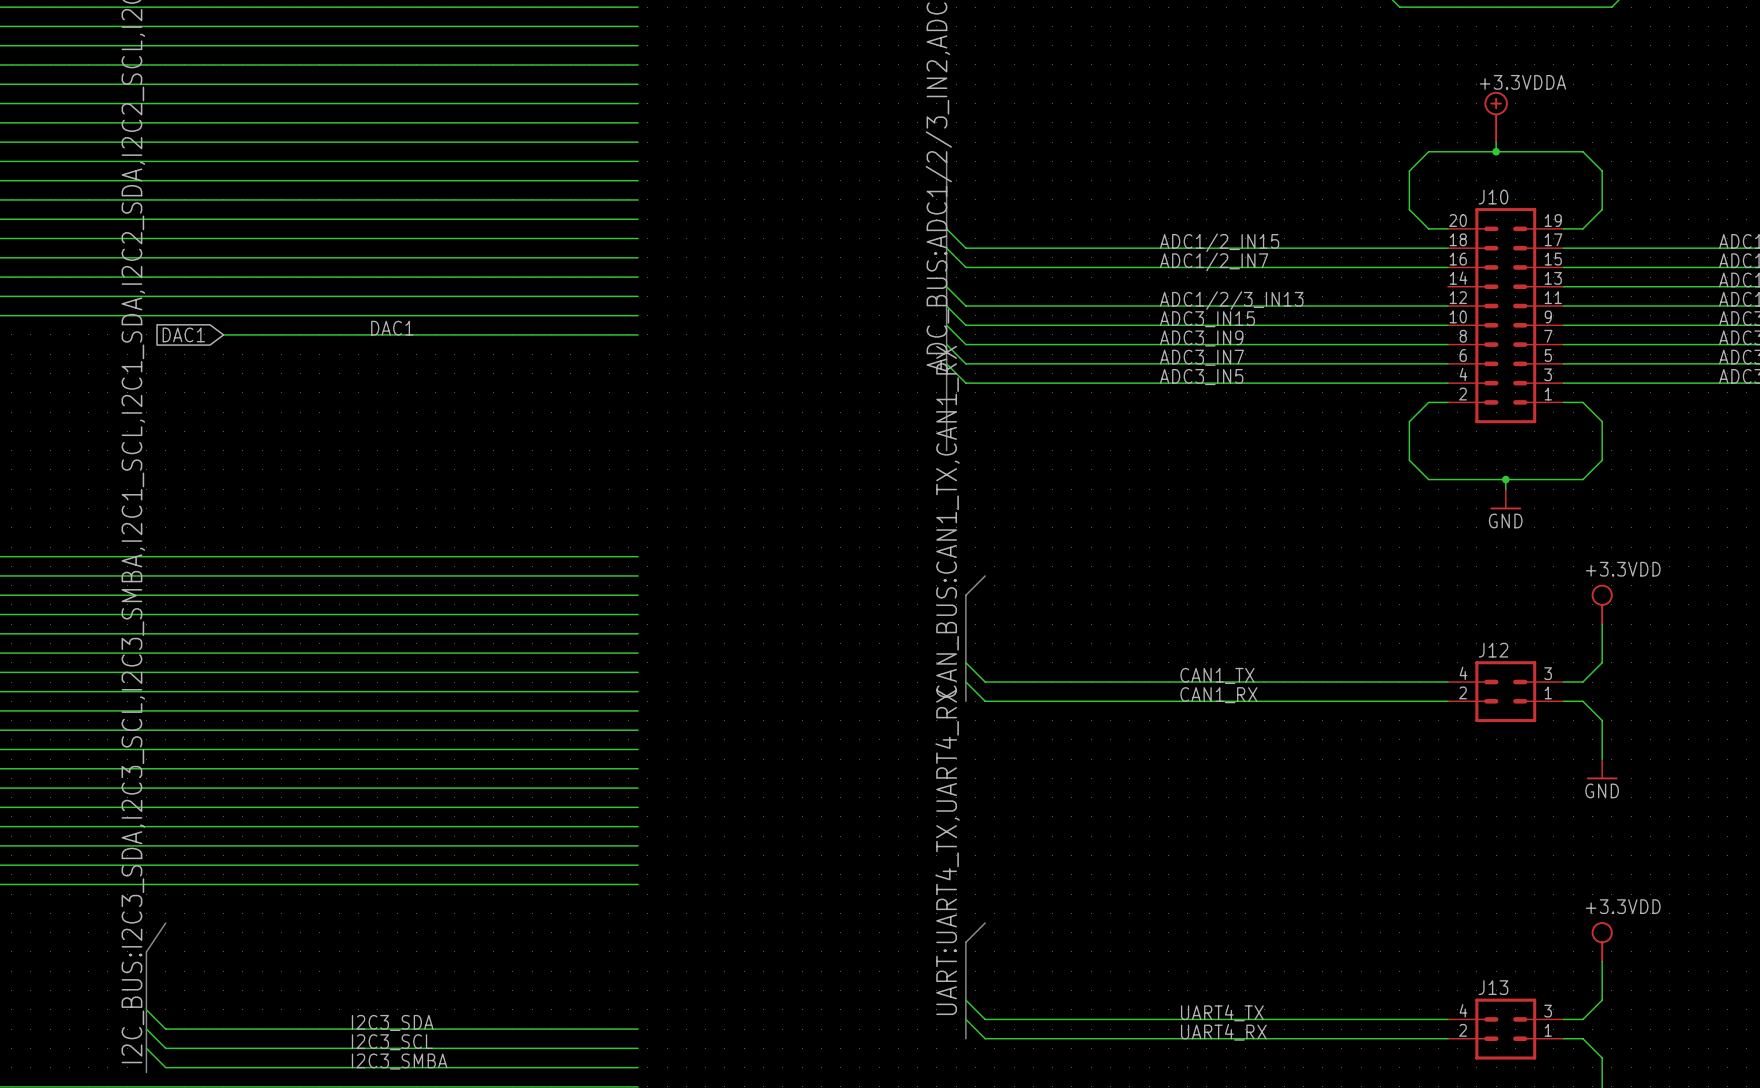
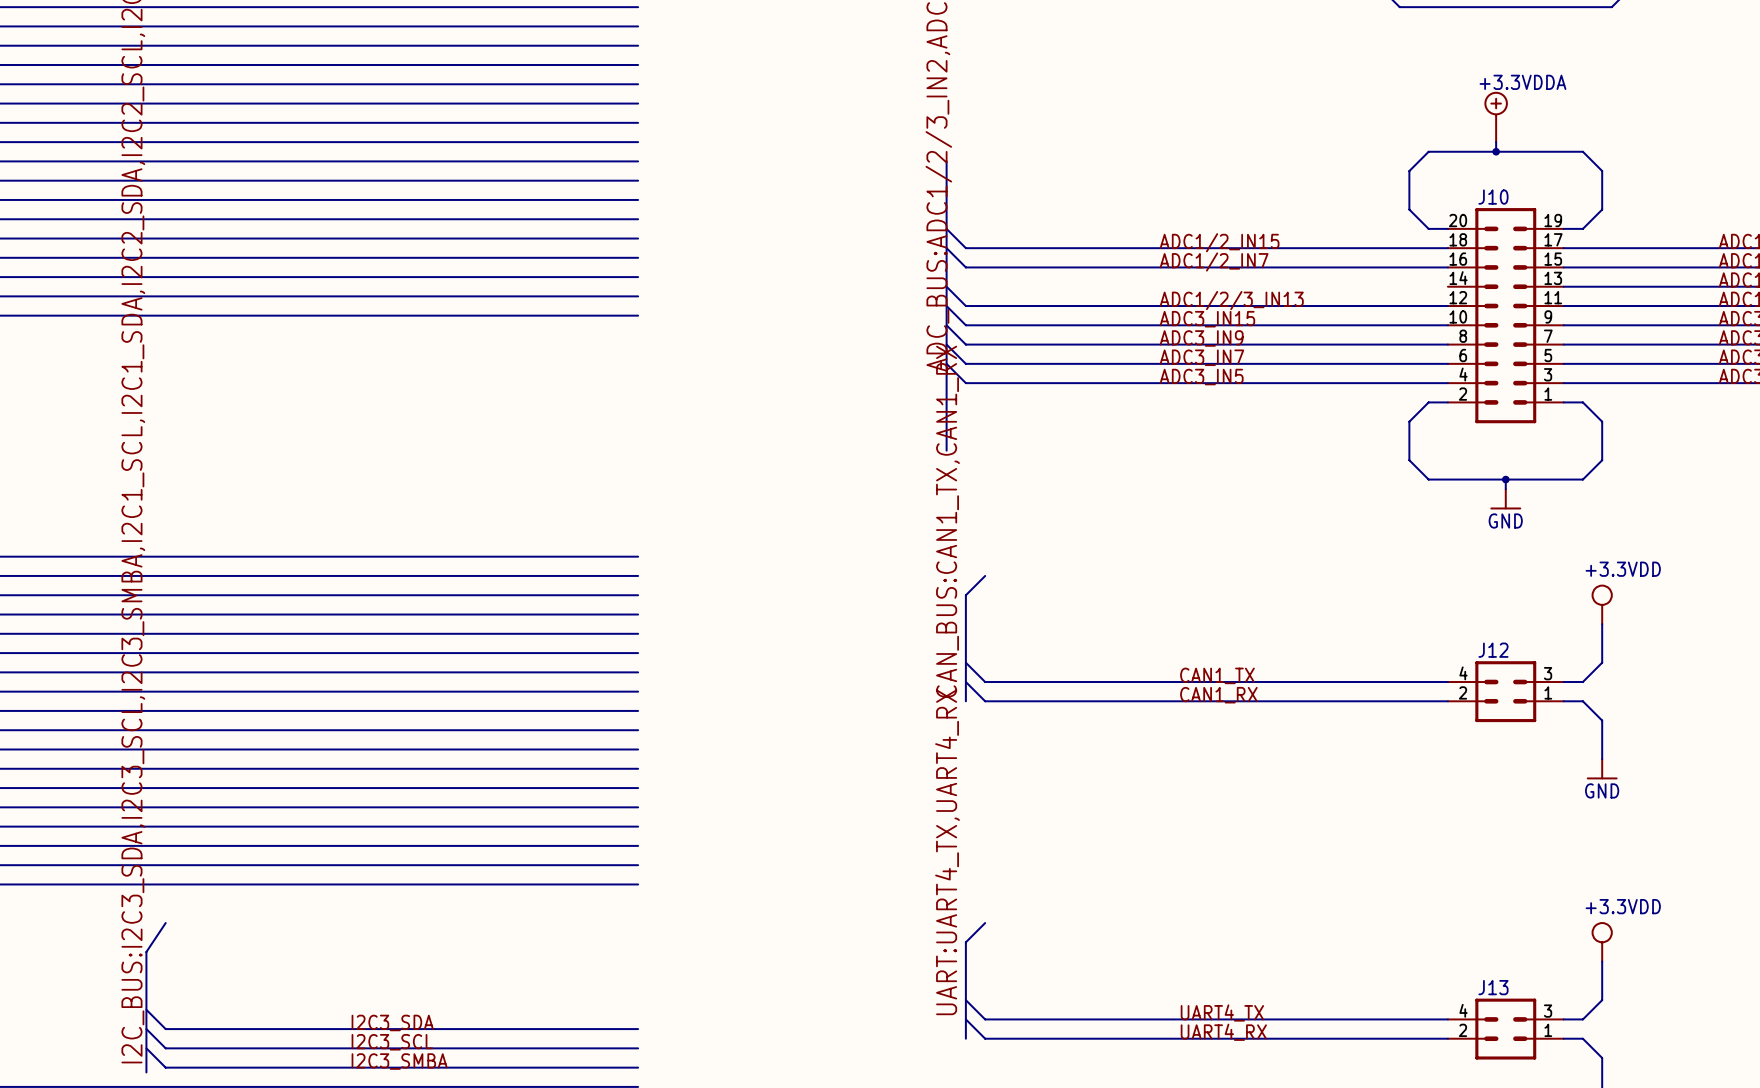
label: DAC1 (392, 328) -> none
global label: DAC1 (183, 334) -> none
wire: (223, 334) (638, 334) -> none

